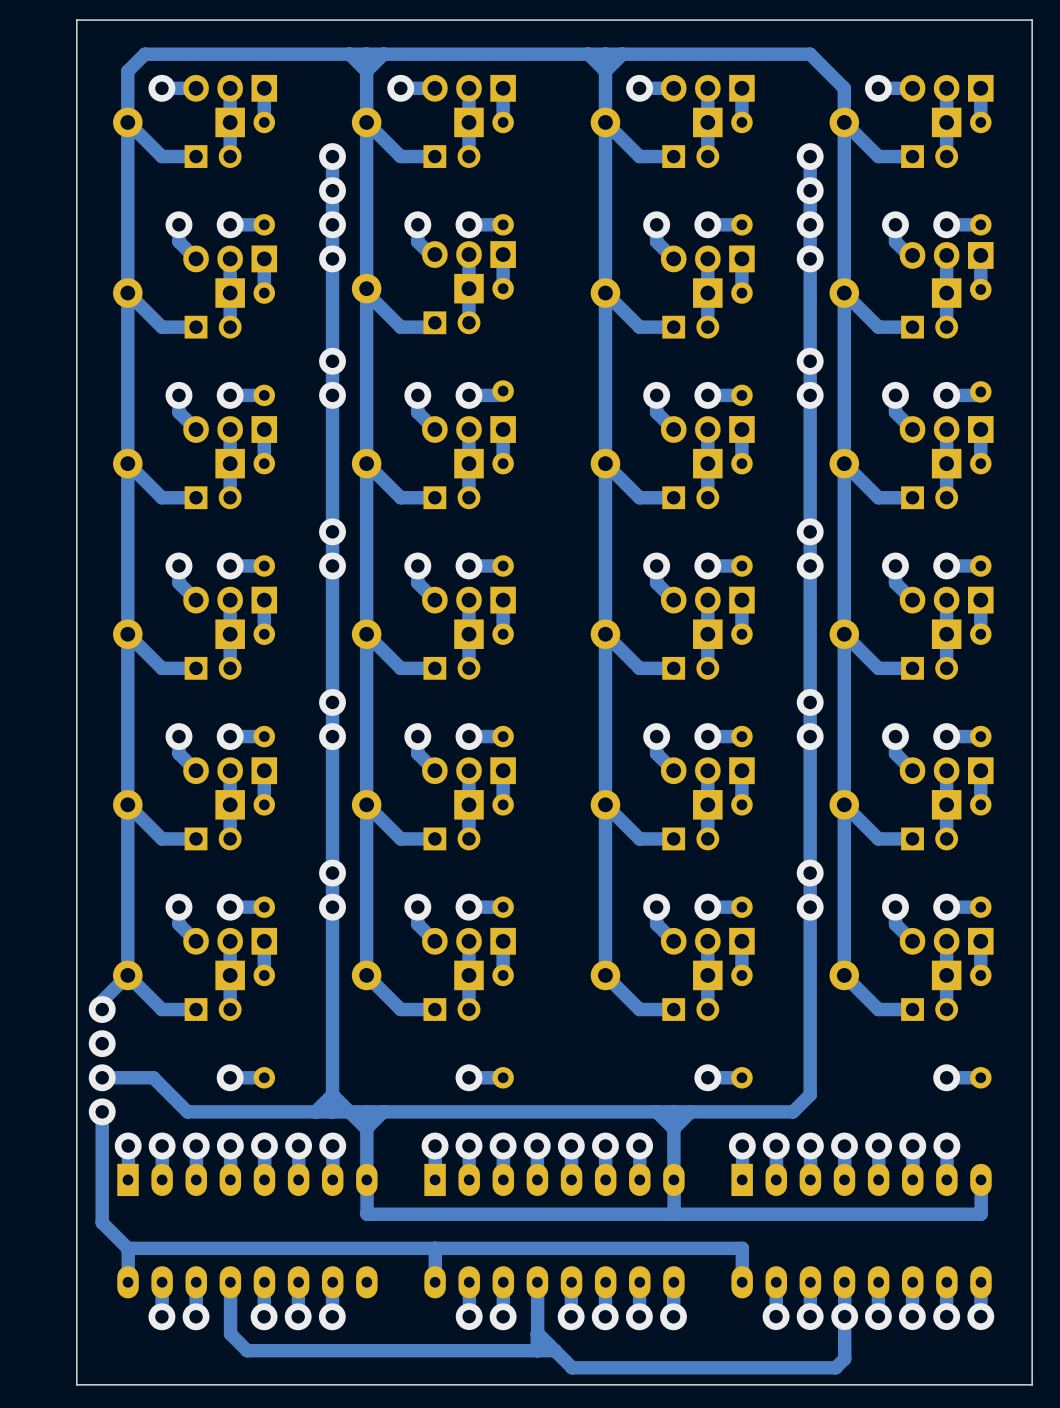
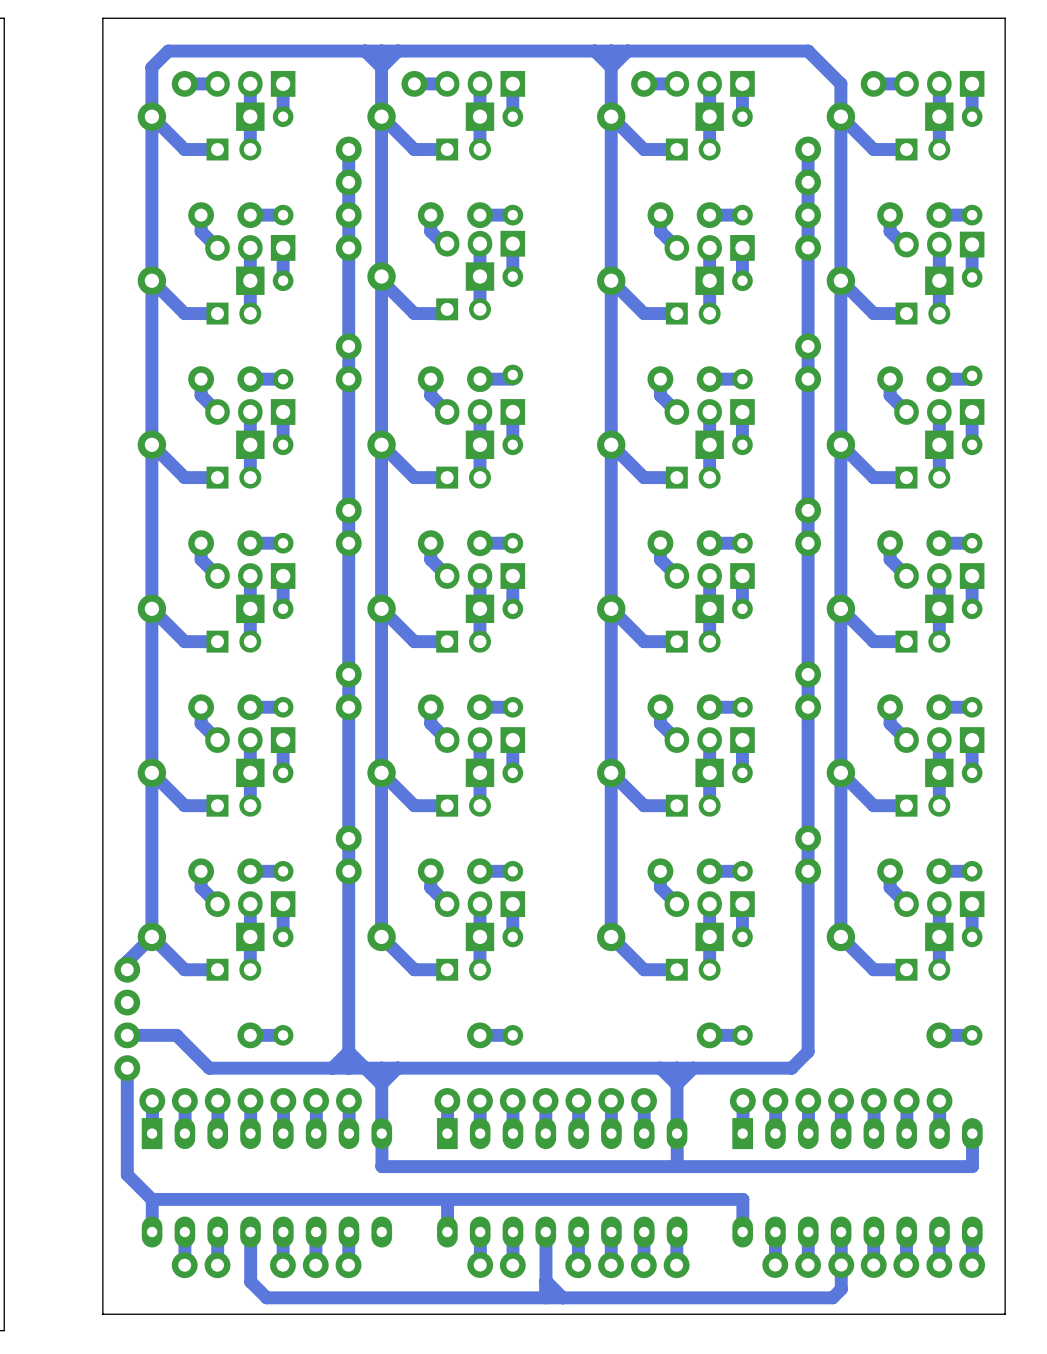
board edge: (1015, 20) (1032, 20) (1032, 1384) (76, 1384) (76, 1367) -> (1005, 18) (1005, 1314) (102, 1314)
track: (844, 1341) (844, 1358) (835, 1367) (572, 1367) (555, 1350) -> (841, 1289) (832, 1297) (562, 1297)

